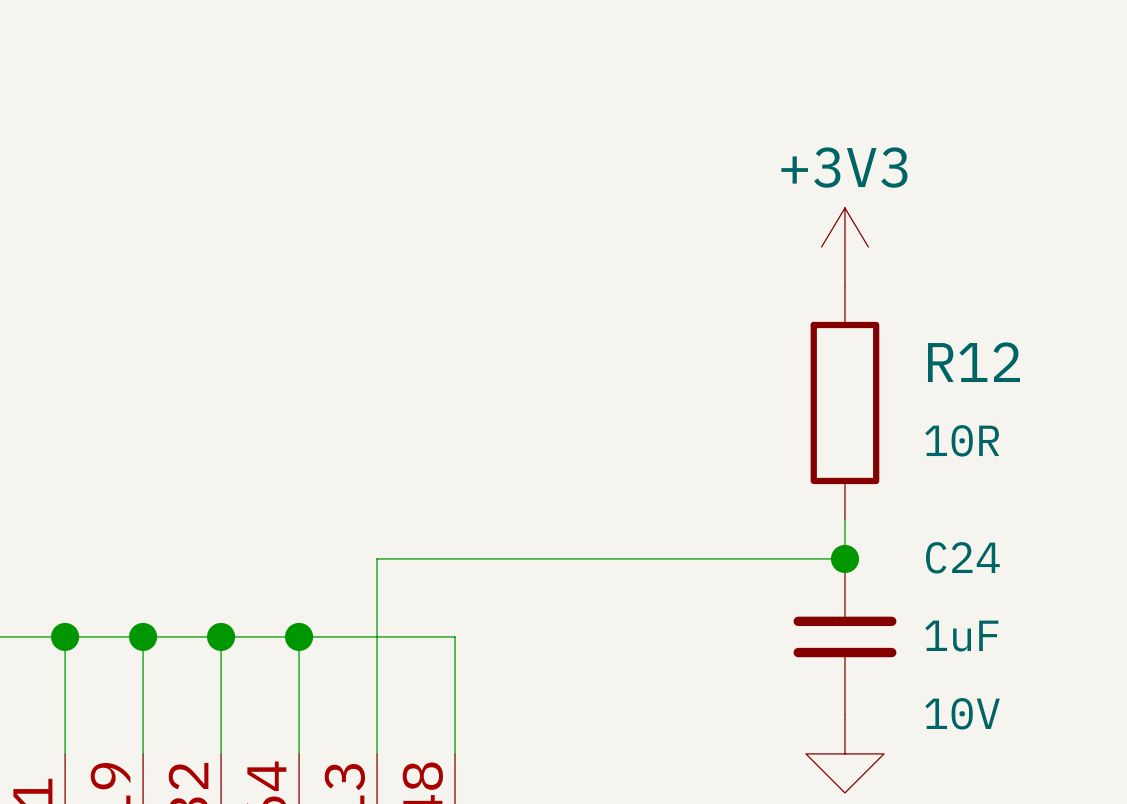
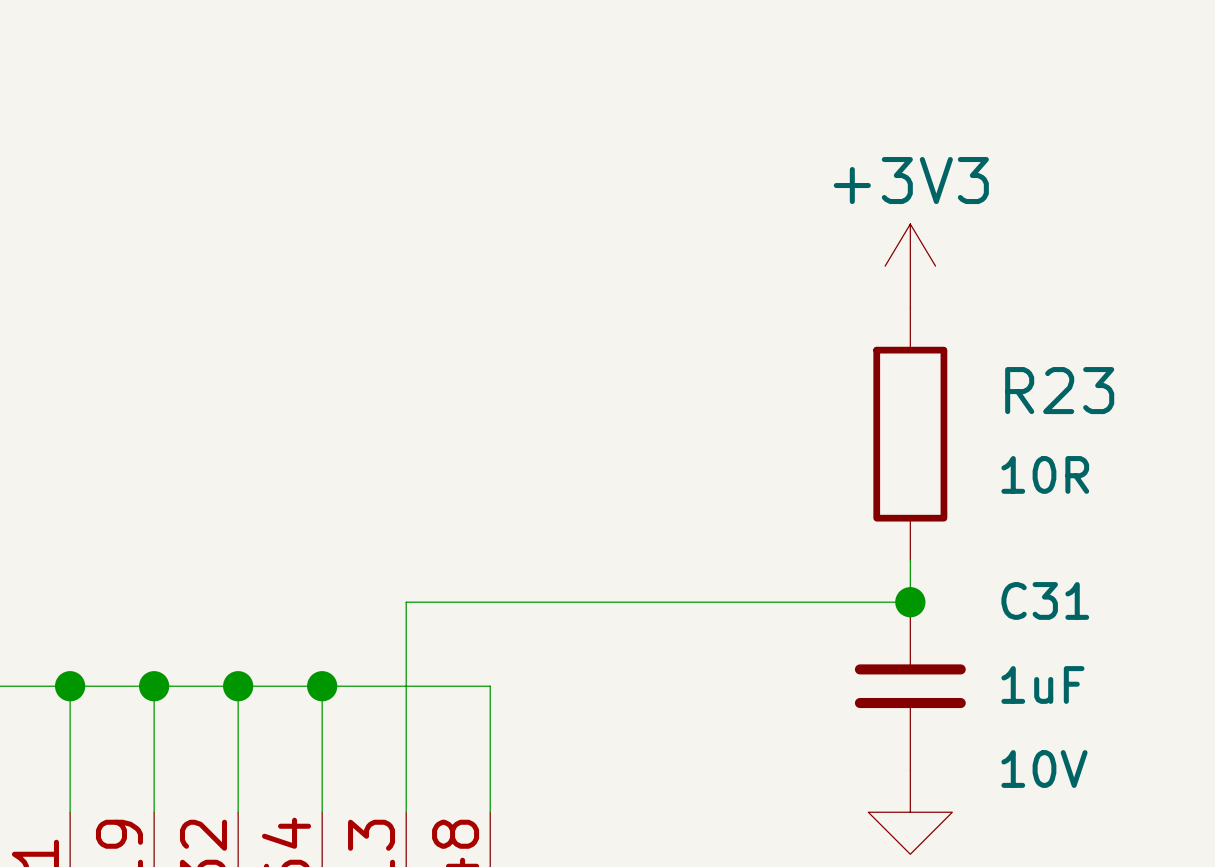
R12 name: R12 (974, 362) -> R23 (1059, 390)
C24 name: C24 (962, 557) -> C31 (1045, 600)

